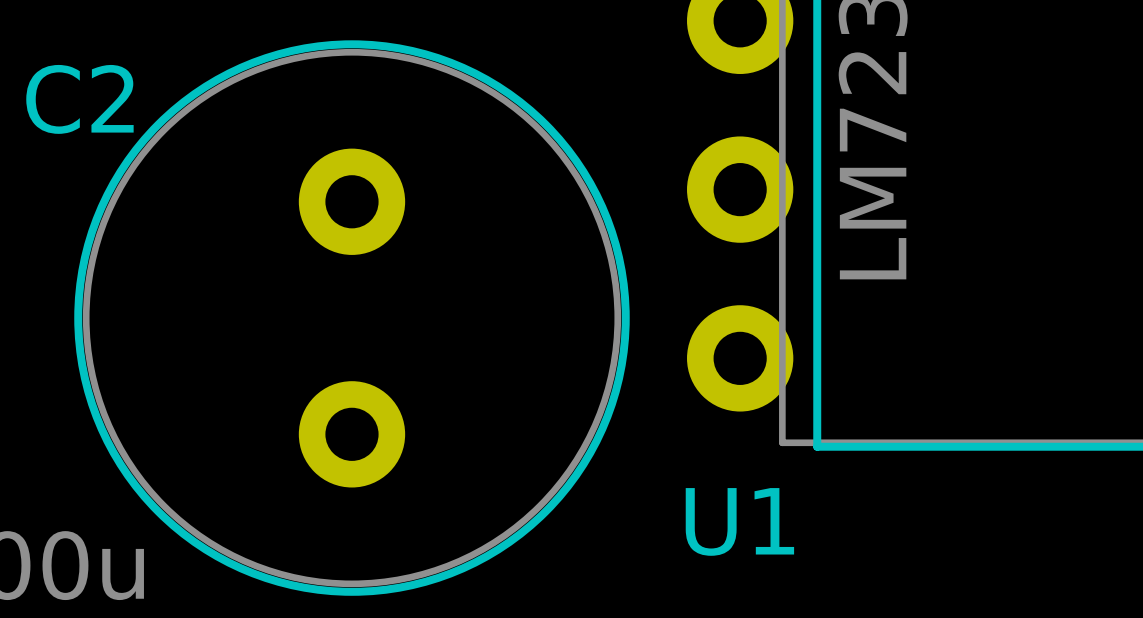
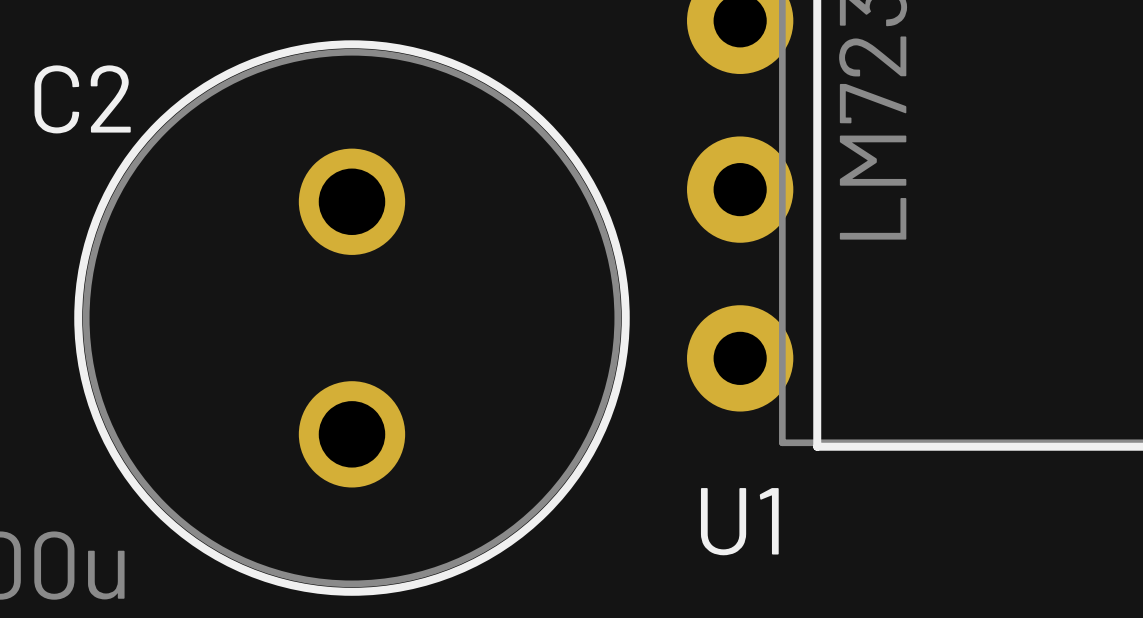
C2 footprint: [74, 40, 630, 596] -> [74, 40, 630, 596]

